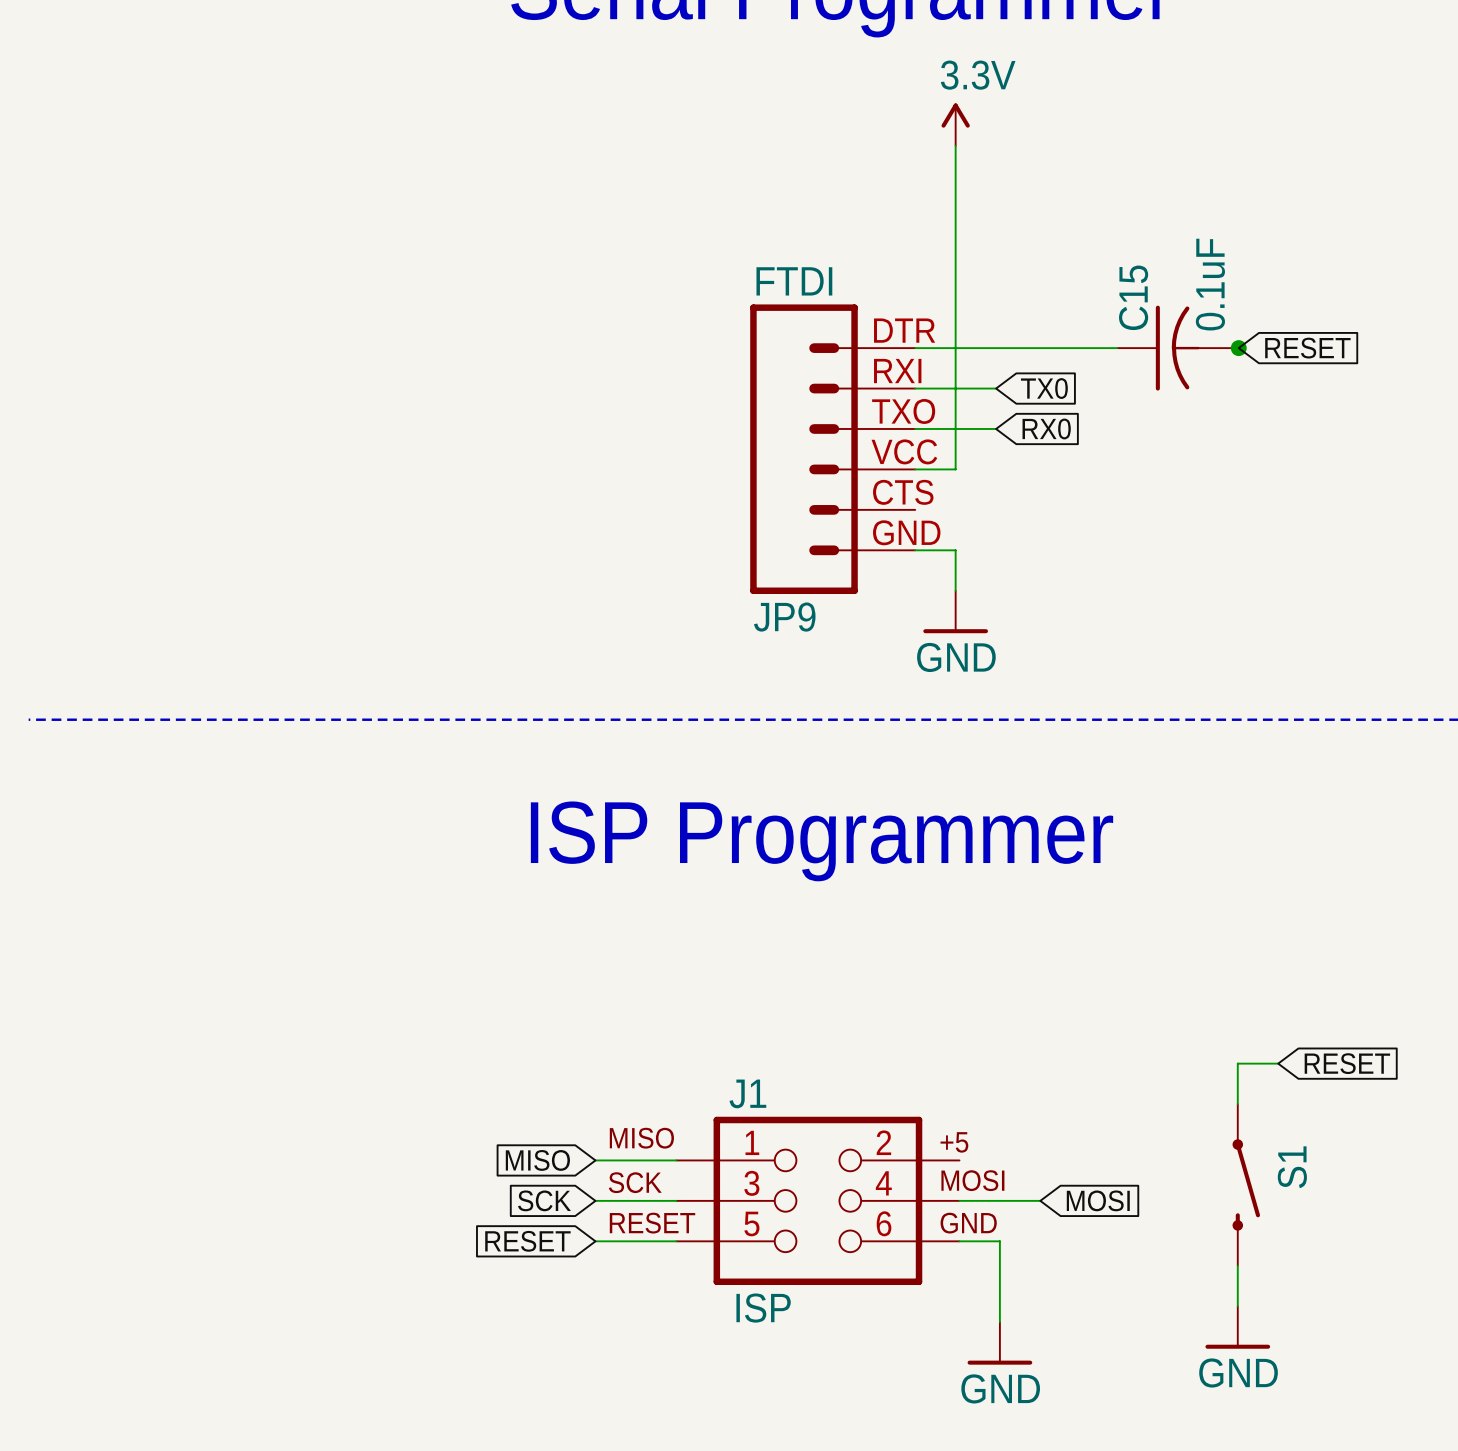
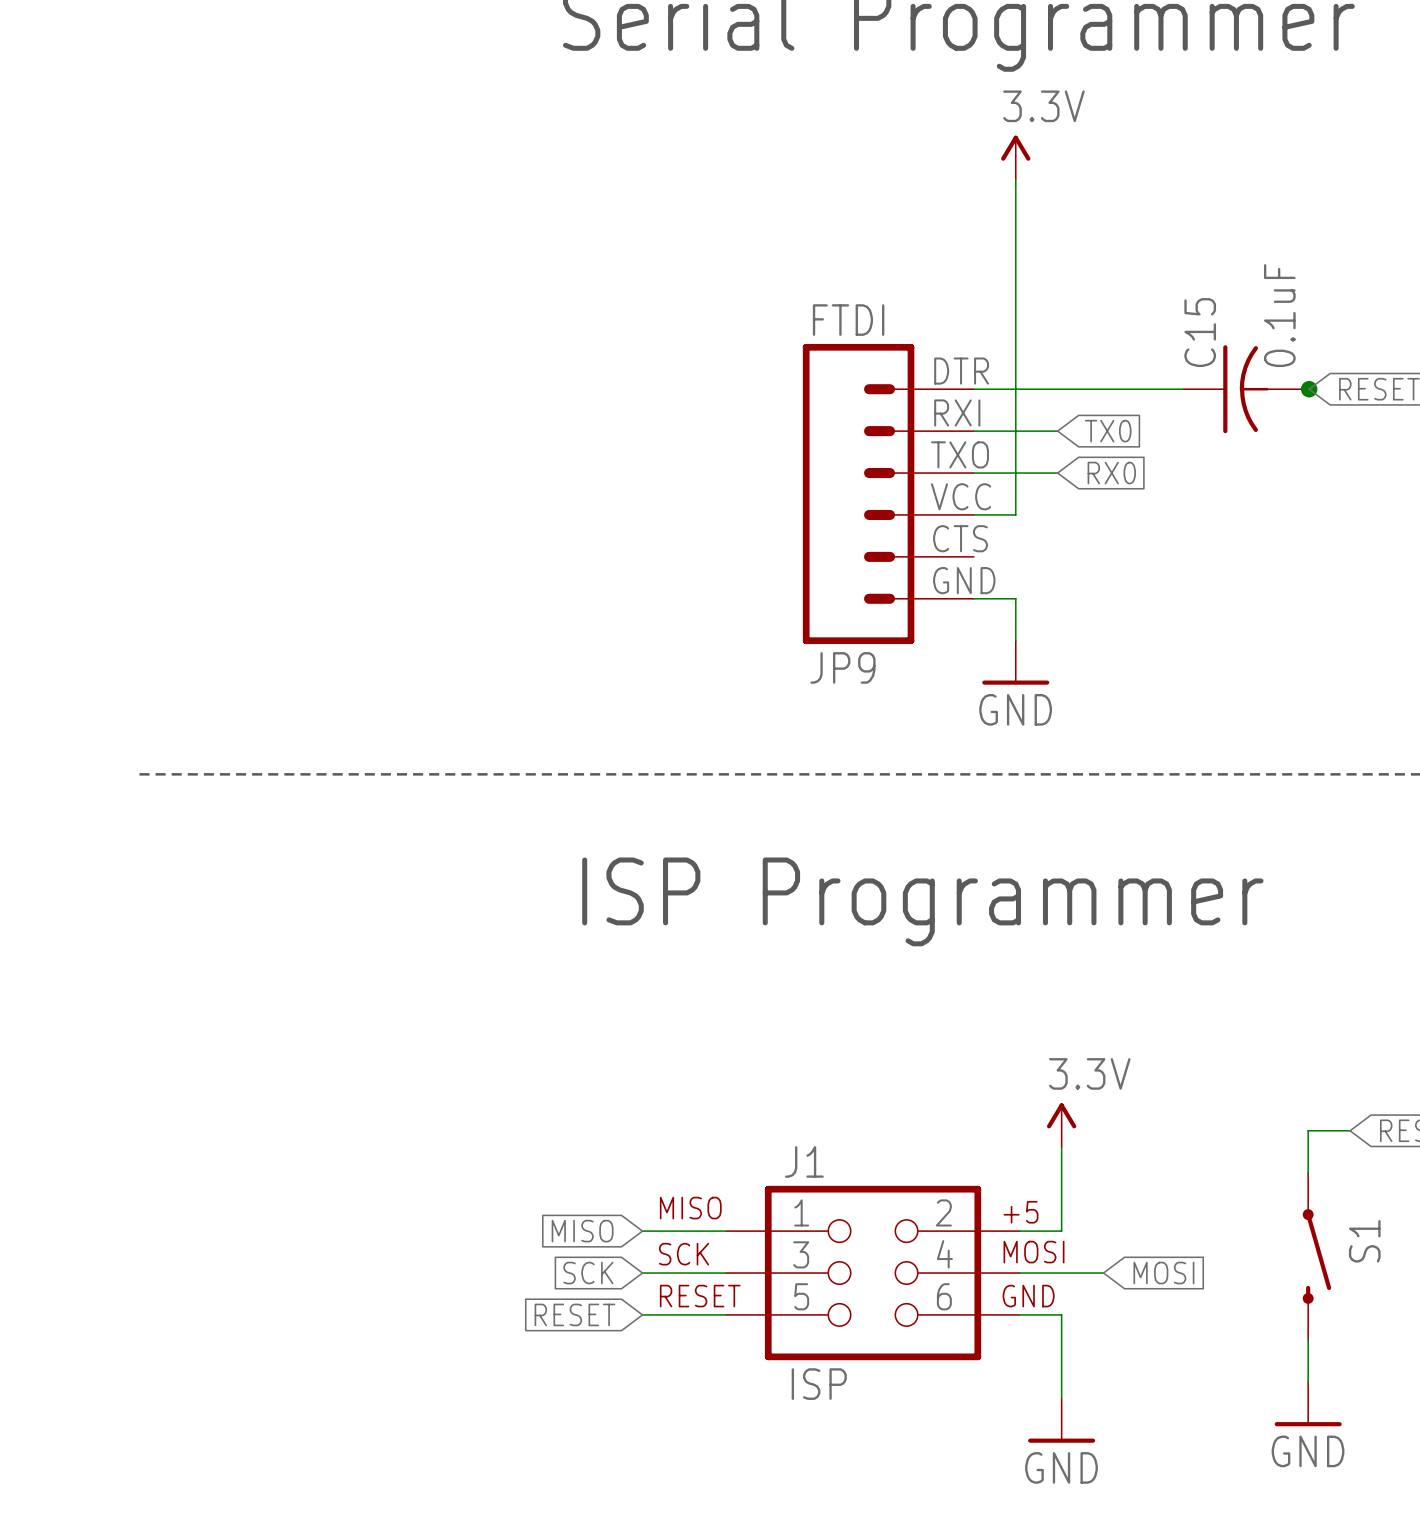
line: (28, 719) (109, 719) -> none
power symbol: none -> 3.3V (1061, 1125)
wire: none -> (1061, 1147) (1061, 1231) (1019, 1231)

